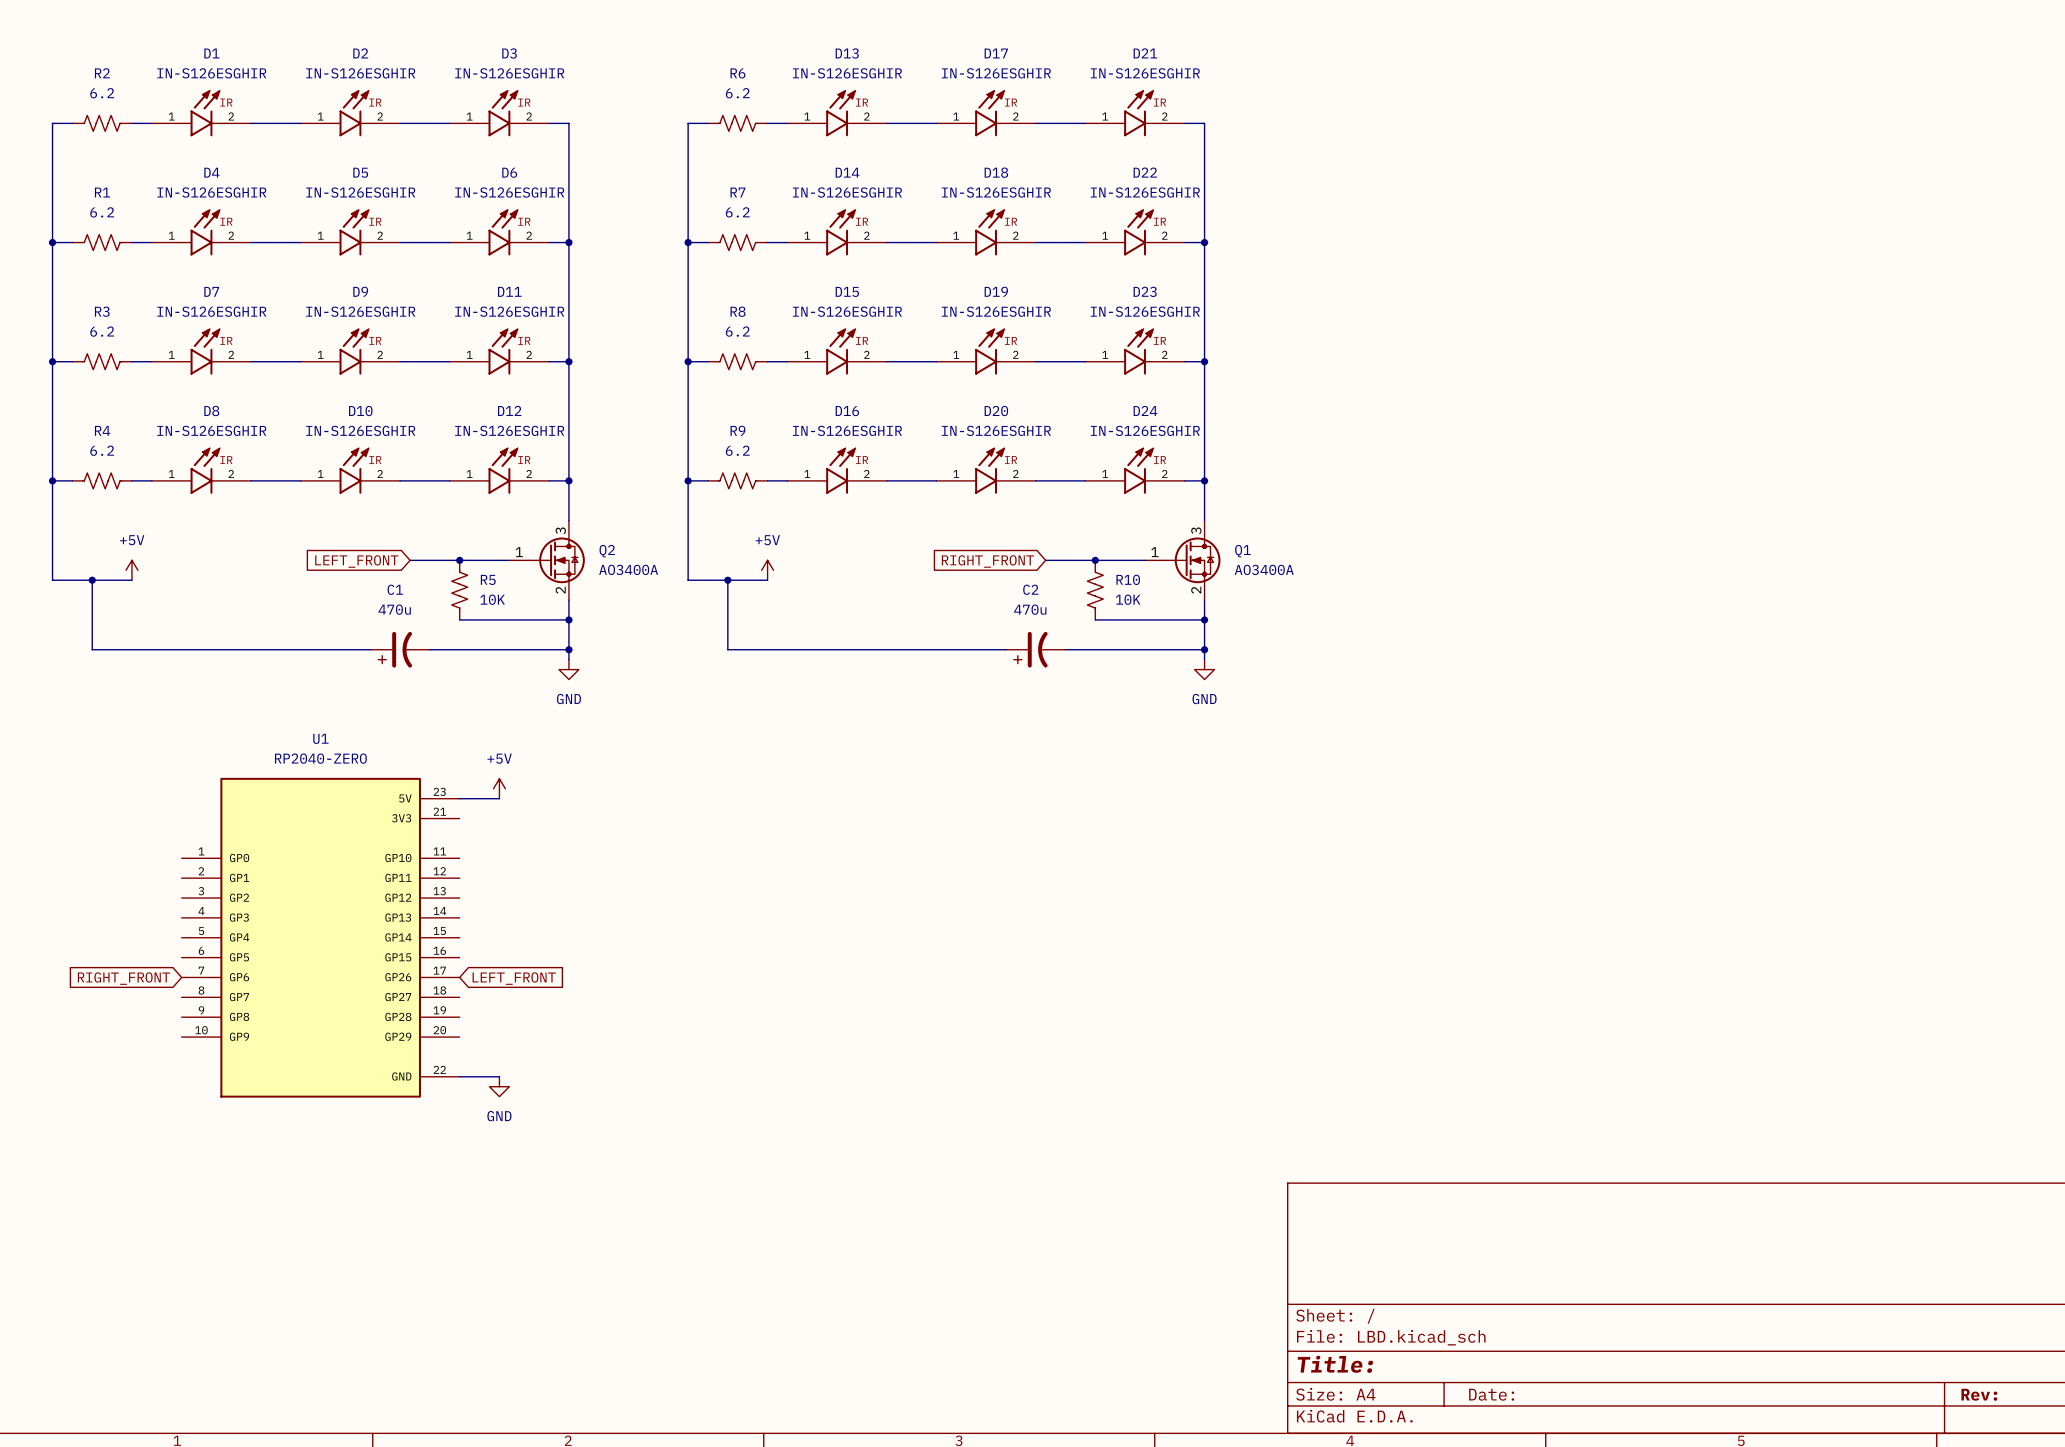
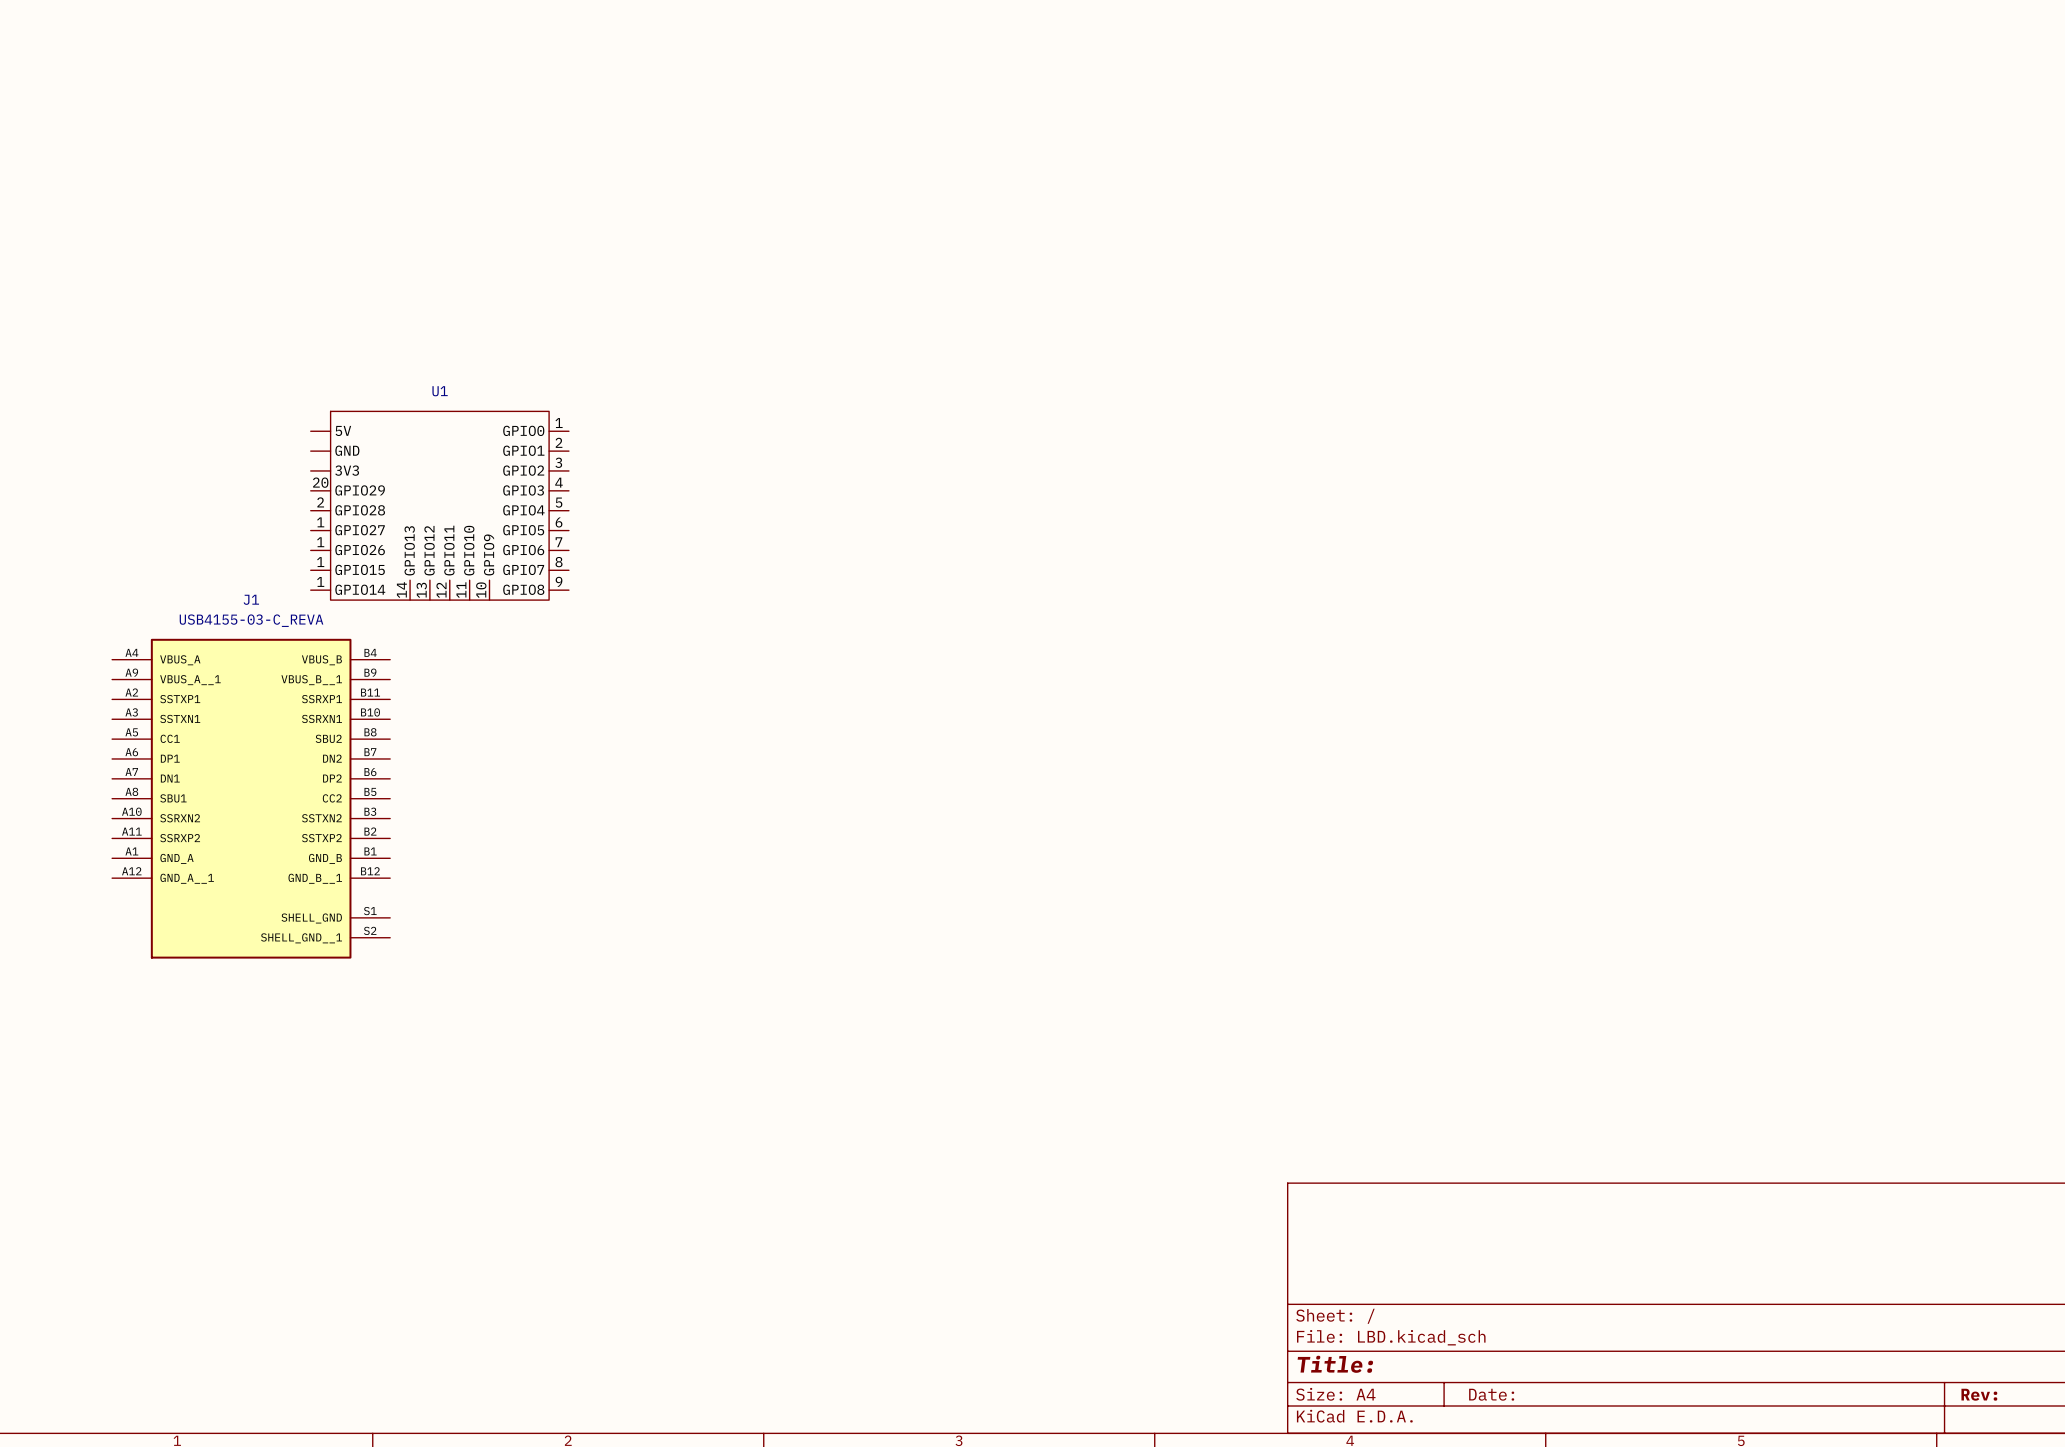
D1: IN-S126ESGHIR (201, 113) -> none
D2: IN-S126ESGHIR (350, 113) -> none
D3: IN-S126ESGHIR (499, 113) -> none
D13: IN-S126ESGHIR (837, 113) -> none
D17: IN-S126ESGHIR (986, 113) -> none
D21: IN-S126ESGHIR (1135, 113) -> none
wire: (72, 123) (52, 123) (52, 580) (131, 580) -> none
R2: 6.2 (102, 123) -> none
wire: (131, 123) (151, 123) -> none
wire: (251, 123) (300, 123) -> none
wire: (400, 123) (449, 123) -> none
wire: (549, 123) (568, 123) (568, 520) -> none
wire: (707, 123) (688, 123) (688, 580) (767, 580) -> none
R6: 6.2 (737, 123) -> none
wire: (767, 123) (787, 123) -> none
wire: (886, 123) (936, 123) -> none
wire: (1035, 123) (1085, 123) -> none
wire: (1184, 123) (1204, 123) (1204, 520) -> none
D4: IN-S126ESGHIR (201, 232) -> none
D5: IN-S126ESGHIR (350, 232) -> none
D6: IN-S126ESGHIR (499, 232) -> none
D14: IN-S126ESGHIR (837, 232) -> none
D18: IN-S126ESGHIR (986, 232) -> none
D22: IN-S126ESGHIR (1135, 232) -> none
wire: (52, 242) (72, 242) -> none
junction: (52, 242) -> none
R1: 6.2 (102, 242) -> none
wire: (131, 242) (151, 242) -> none
wire: (251, 242) (300, 242) -> none
wire: (400, 242) (449, 242) -> none
wire: (549, 242) (568, 242) -> none
junction: (568, 242) -> none
wire: (688, 242) (707, 242) -> none
junction: (688, 242) -> none
R7: 6.2 (737, 242) -> none
wire: (767, 242) (787, 242) -> none
wire: (886, 242) (936, 242) -> none
wire: (1035, 242) (1085, 242) -> none
wire: (1184, 242) (1204, 242) -> none
junction: (1204, 242) -> none
D7: IN-S126ESGHIR (201, 351) -> none
D9: IN-S126ESGHIR (350, 351) -> none
D11: IN-S126ESGHIR (499, 351) -> none
D15: IN-S126ESGHIR (837, 351) -> none
D19: IN-S126ESGHIR (986, 351) -> none
D23: IN-S126ESGHIR (1135, 351) -> none
wire: (52, 361) (72, 361) -> none
junction: (52, 361) -> none
R3: 6.2 (102, 361) -> none
wire: (131, 361) (151, 361) -> none
wire: (251, 361) (300, 361) -> none
wire: (400, 361) (449, 361) -> none
wire: (549, 361) (568, 361) -> none
junction: (568, 361) -> none
wire: (688, 361) (707, 361) -> none
junction: (688, 361) -> none
R8: 6.2 (737, 361) -> none
wire: (767, 361) (787, 361) -> none
wire: (886, 361) (936, 361) -> none
wire: (1035, 361) (1085, 361) -> none
wire: (1184, 361) (1204, 361) -> none
junction: (1204, 361) -> none
D8: IN-S126ESGHIR (201, 470) -> none
D10: IN-S126ESGHIR (350, 470) -> none
D12: IN-S126ESGHIR (499, 470) -> none
D16: IN-S126ESGHIR (837, 470) -> none
D20: IN-S126ESGHIR (986, 470) -> none
D24: IN-S126ESGHIR (1135, 470) -> none
wire: (52, 480) (72, 480) -> none
junction: (52, 480) -> none
R4: 6.2 (102, 480) -> none
wire: (131, 480) (151, 480) -> none
wire: (251, 480) (300, 480) -> none
wire: (400, 480) (449, 480) -> none
wire: (549, 480) (568, 480) -> none
junction: (568, 480) -> none
wire: (688, 480) (707, 480) -> none
junction: (688, 480) -> none
R9: 6.2 (737, 480) -> none
wire: (767, 480) (787, 480) -> none
wire: (886, 480) (936, 480) -> none
wire: (1035, 480) (1085, 480) -> none
wire: (1184, 480) (1204, 480) -> none
junction: (1204, 480) -> none
wire: (410, 560) (509, 560) -> none
junction: (459, 560) -> none
Q2: AO3400A (547, 560) -> none
wire: (1045, 560) (1144, 560) -> none
junction: (1095, 560) -> none
Q1: AO3400A (1182, 560) -> none
global label: LEFT_FRONT (356, 561) -> none
global label: RIGHT_FRONT (987, 561) -> none
power symbol: +5V (131, 570) -> none
power symbol: +5V (767, 570) -> none
wire: (92, 580) (92, 649) (370, 649) -> none
junction: (92, 580) -> none
wire: (727, 580) (727, 649) (1005, 649) -> none
junction: (727, 580) -> none
R5: 10K (459, 590) -> none
R10: 10K (1095, 590) -> none
wire: (568, 600) (568, 659) -> none
wire: (1204, 600) (1204, 659) -> none
wire: (459, 619) (568, 619) -> none
junction: (568, 619) -> none
wire: (1095, 619) (1204, 619) -> none
junction: (1204, 619) -> none
C1: 470u (400, 649) -> none
wire: (429, 649) (568, 649) -> none
junction: (568, 649) -> none
C2: 470u (1035, 649) -> none
wire: (1065, 649) (1204, 649) -> none
junction: (1204, 649) -> none
power symbol: GND (568, 669) -> none
power symbol: GND (1204, 669) -> none
U1 name position: U1 (320, 738) -> U1 (440, 391)
U1 value: RP2040-ZERO (320, 758) -> none
U1 symbol: [181, 777, 460, 1098] -> [310, 411, 569, 601]
power symbol: +5V (499, 788) -> none
J1: none -> USB4155-03-C_REVA (251, 798)
wire: (459, 798) (499, 798) -> none
global label: RIGHT_FRONT (123, 978) -> none
global label: LEFT_FRONT (514, 978) -> none
wire: (459, 1076) (499, 1076) -> none
power symbol: GND (499, 1086) -> none

